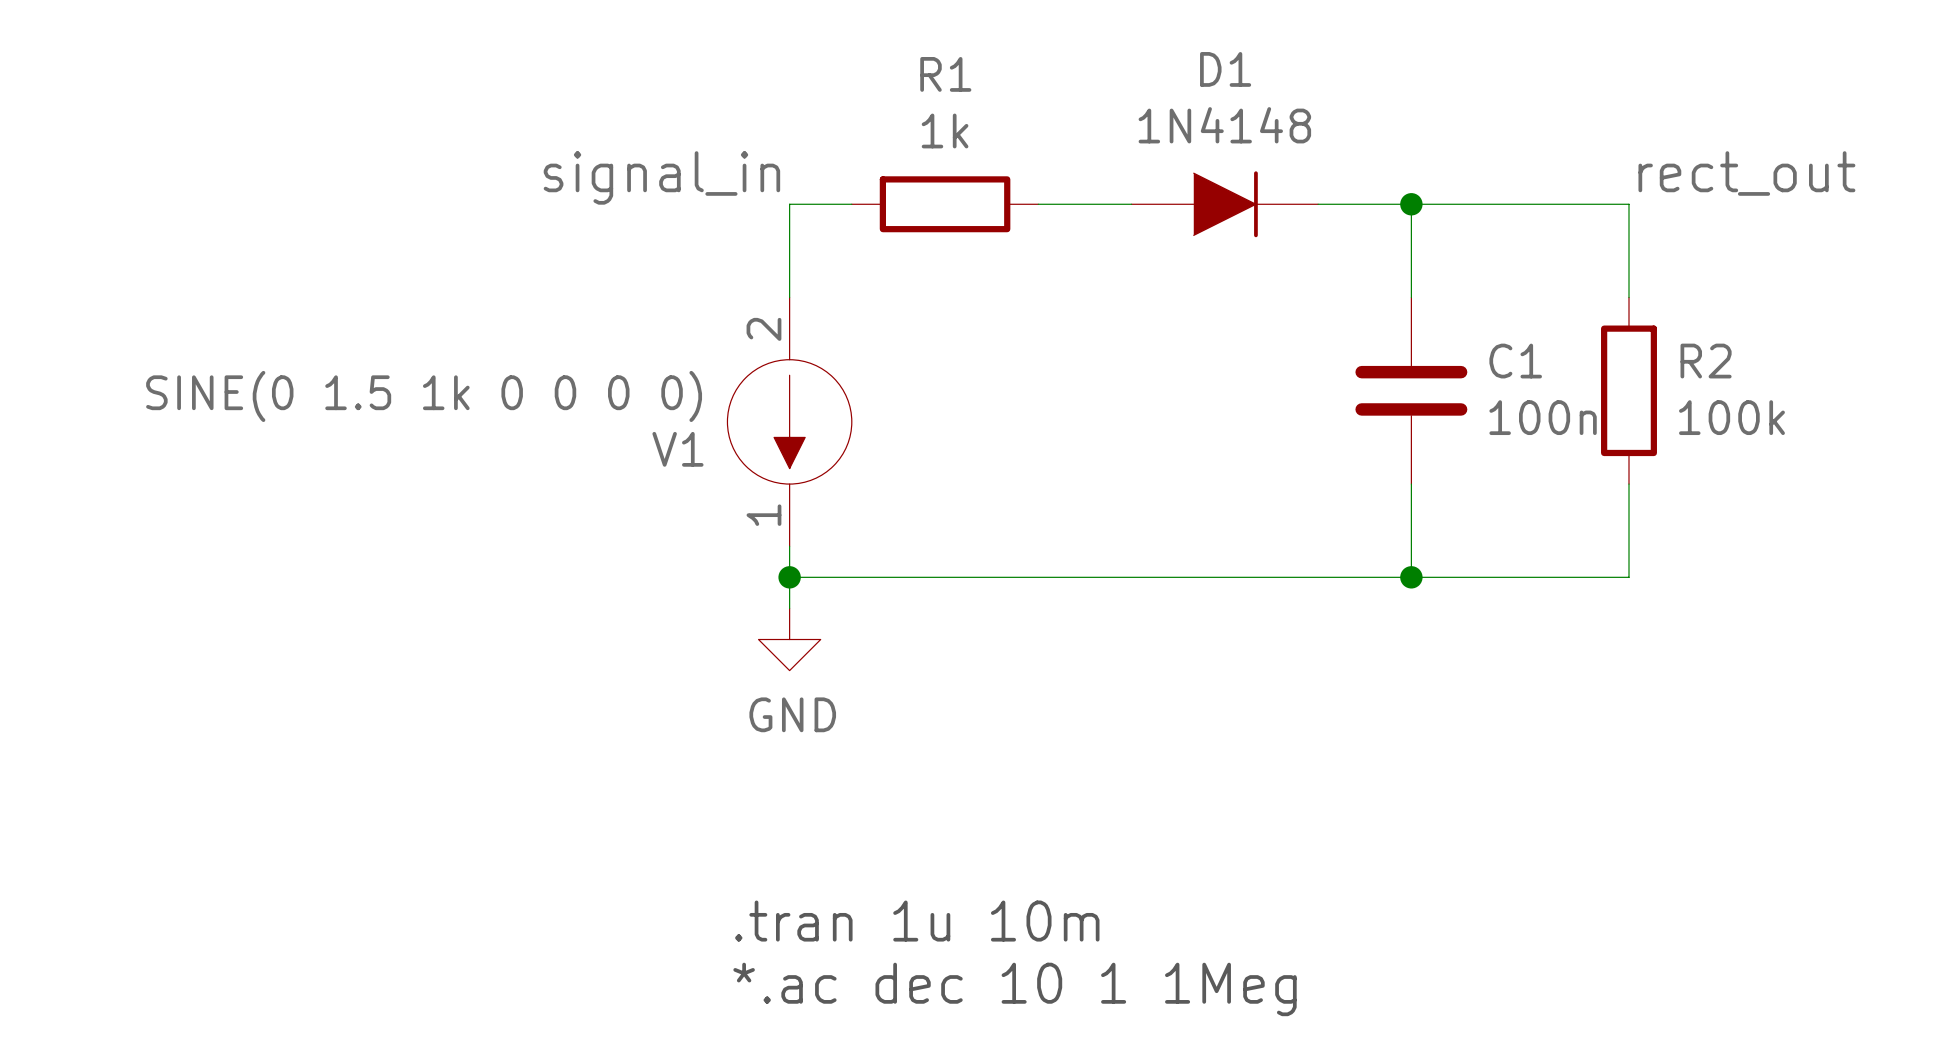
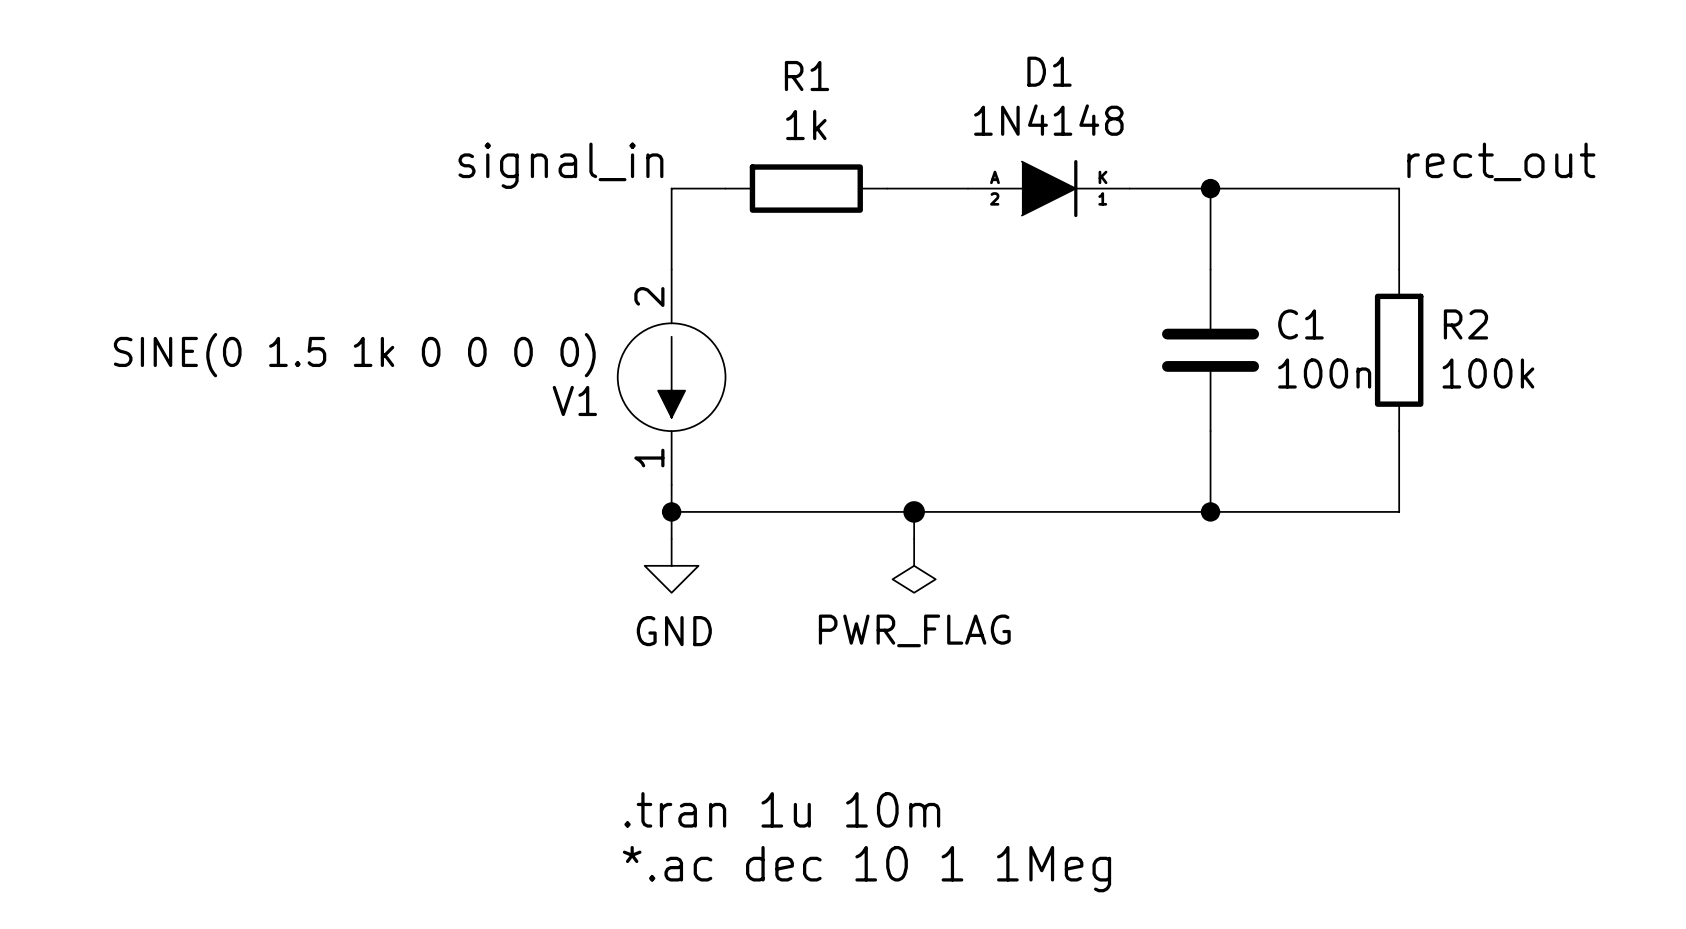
D1 pin name: none -> A (994, 177)
D1 pin name: none -> K (1103, 177)
D1 pin number: none -> 2 (994, 198)
D1 pin number: none -> 1 (1102, 198)
wire: none -> (914, 511) (914, 538)
junction: none -> (914, 511)
power symbol: none -> PWR_FLAG (914, 565)

